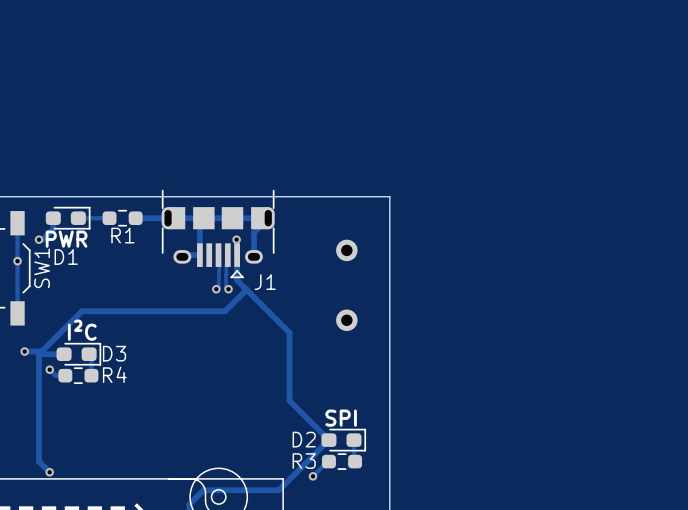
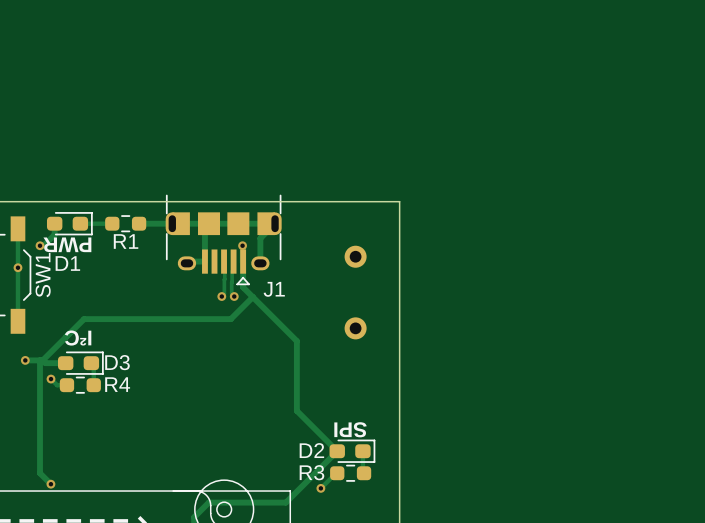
D1 value rotation: 0° (66, 239) -> 180° (67, 244)
D3 value rotation: 0° (82, 330) -> 180° (78, 338)
D2 value rotation: 0° (341, 418) -> 180° (350, 429)

